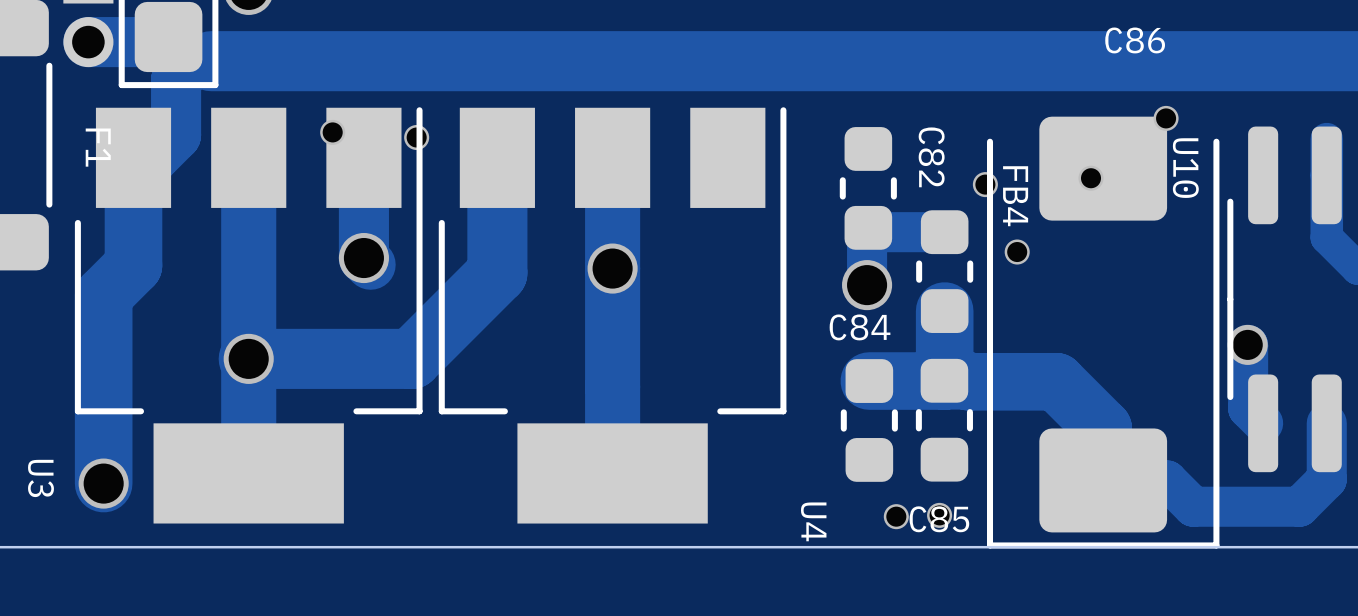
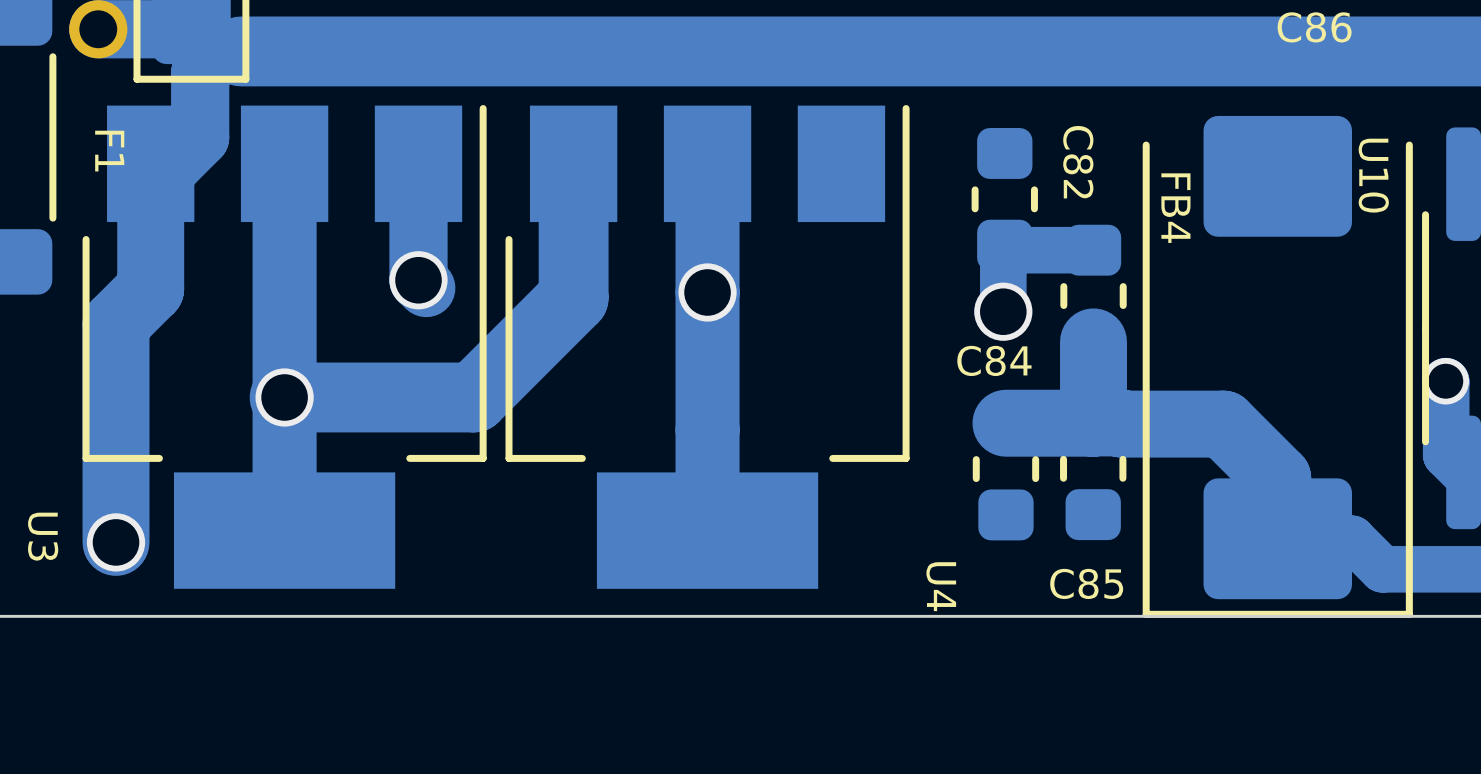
via: (1166, 118) -> none
via: (332, 132) -> none
via: (416, 137) -> none
via: (1091, 178) -> none
via: (985, 184) -> none
via: (1017, 252) -> none
via: (939, 515) -> none
via: (896, 516) -> none

